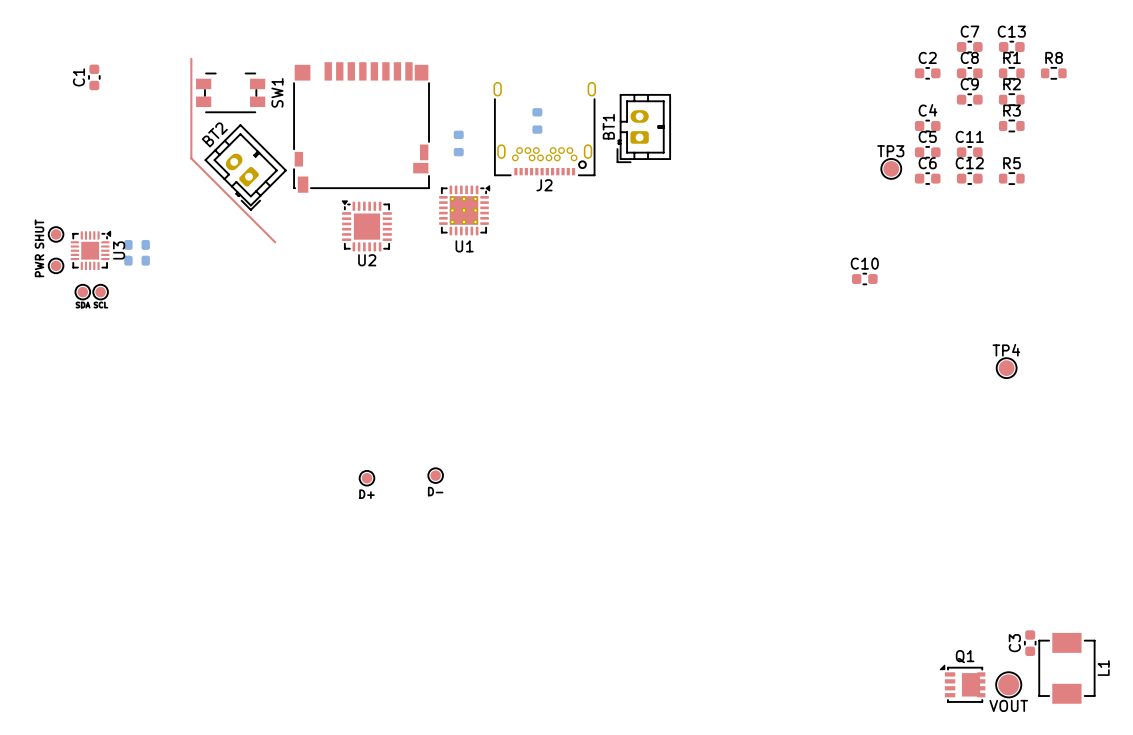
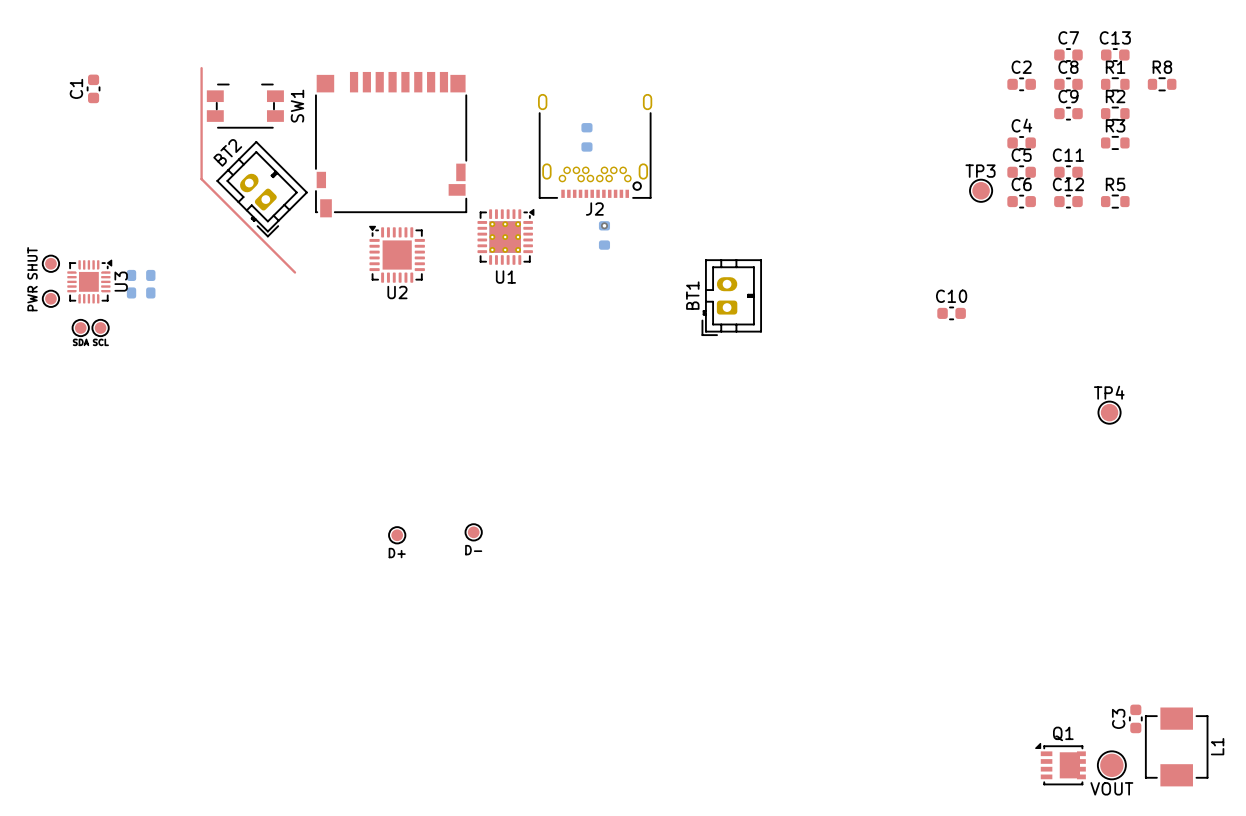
BT1 position: (643, 128) -> (731, 297)
part position: (458, 143) -> (604, 235)
via: none -> (604, 225)

